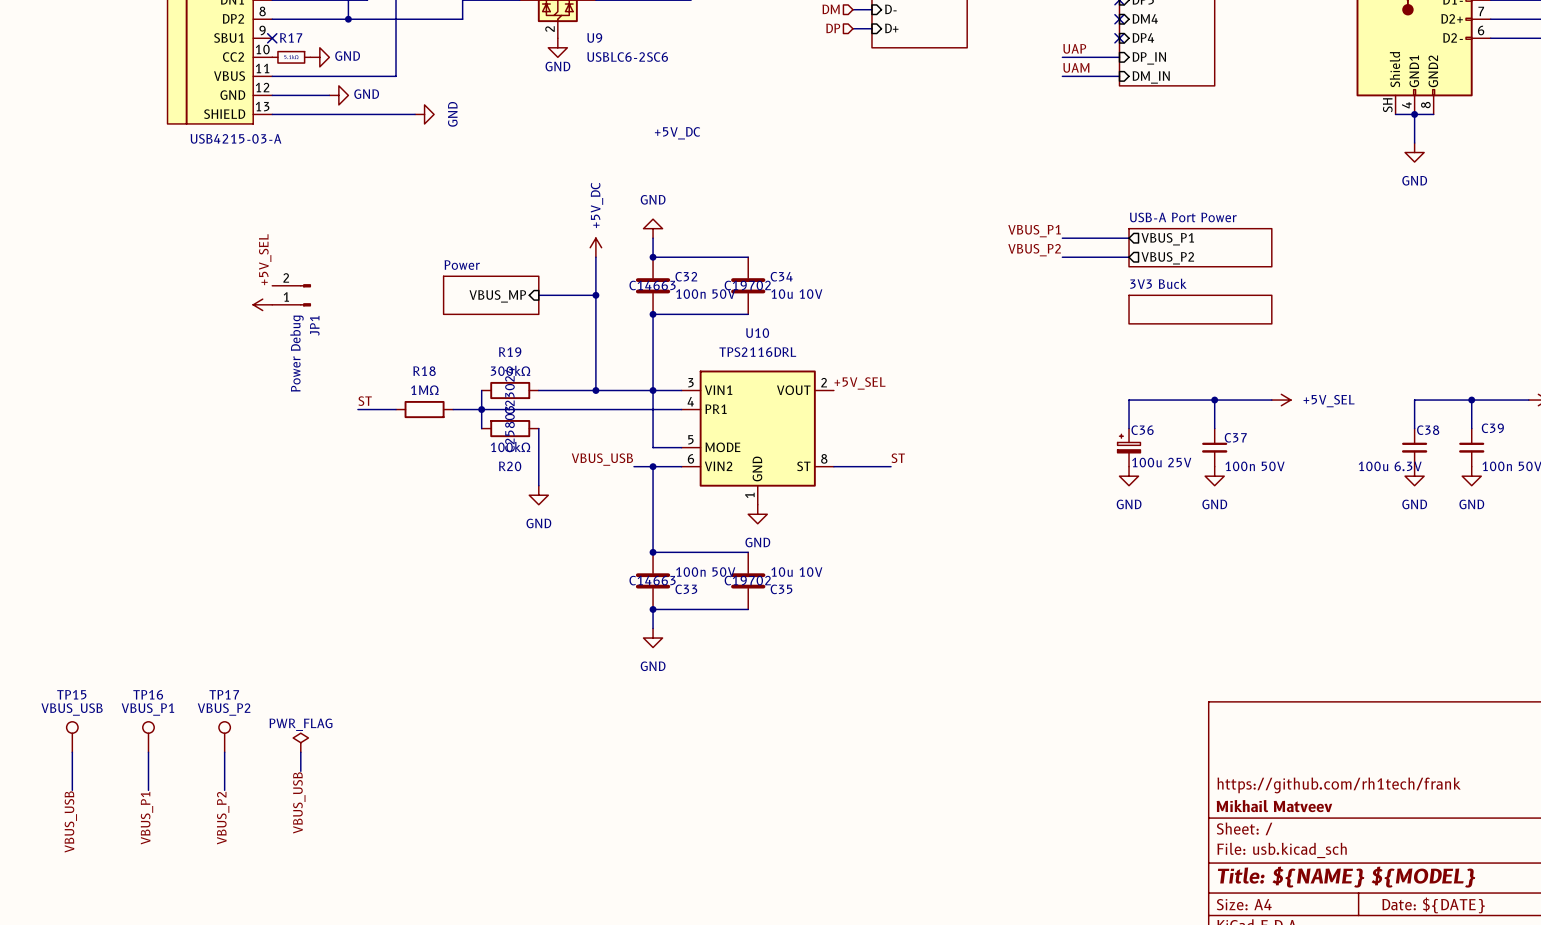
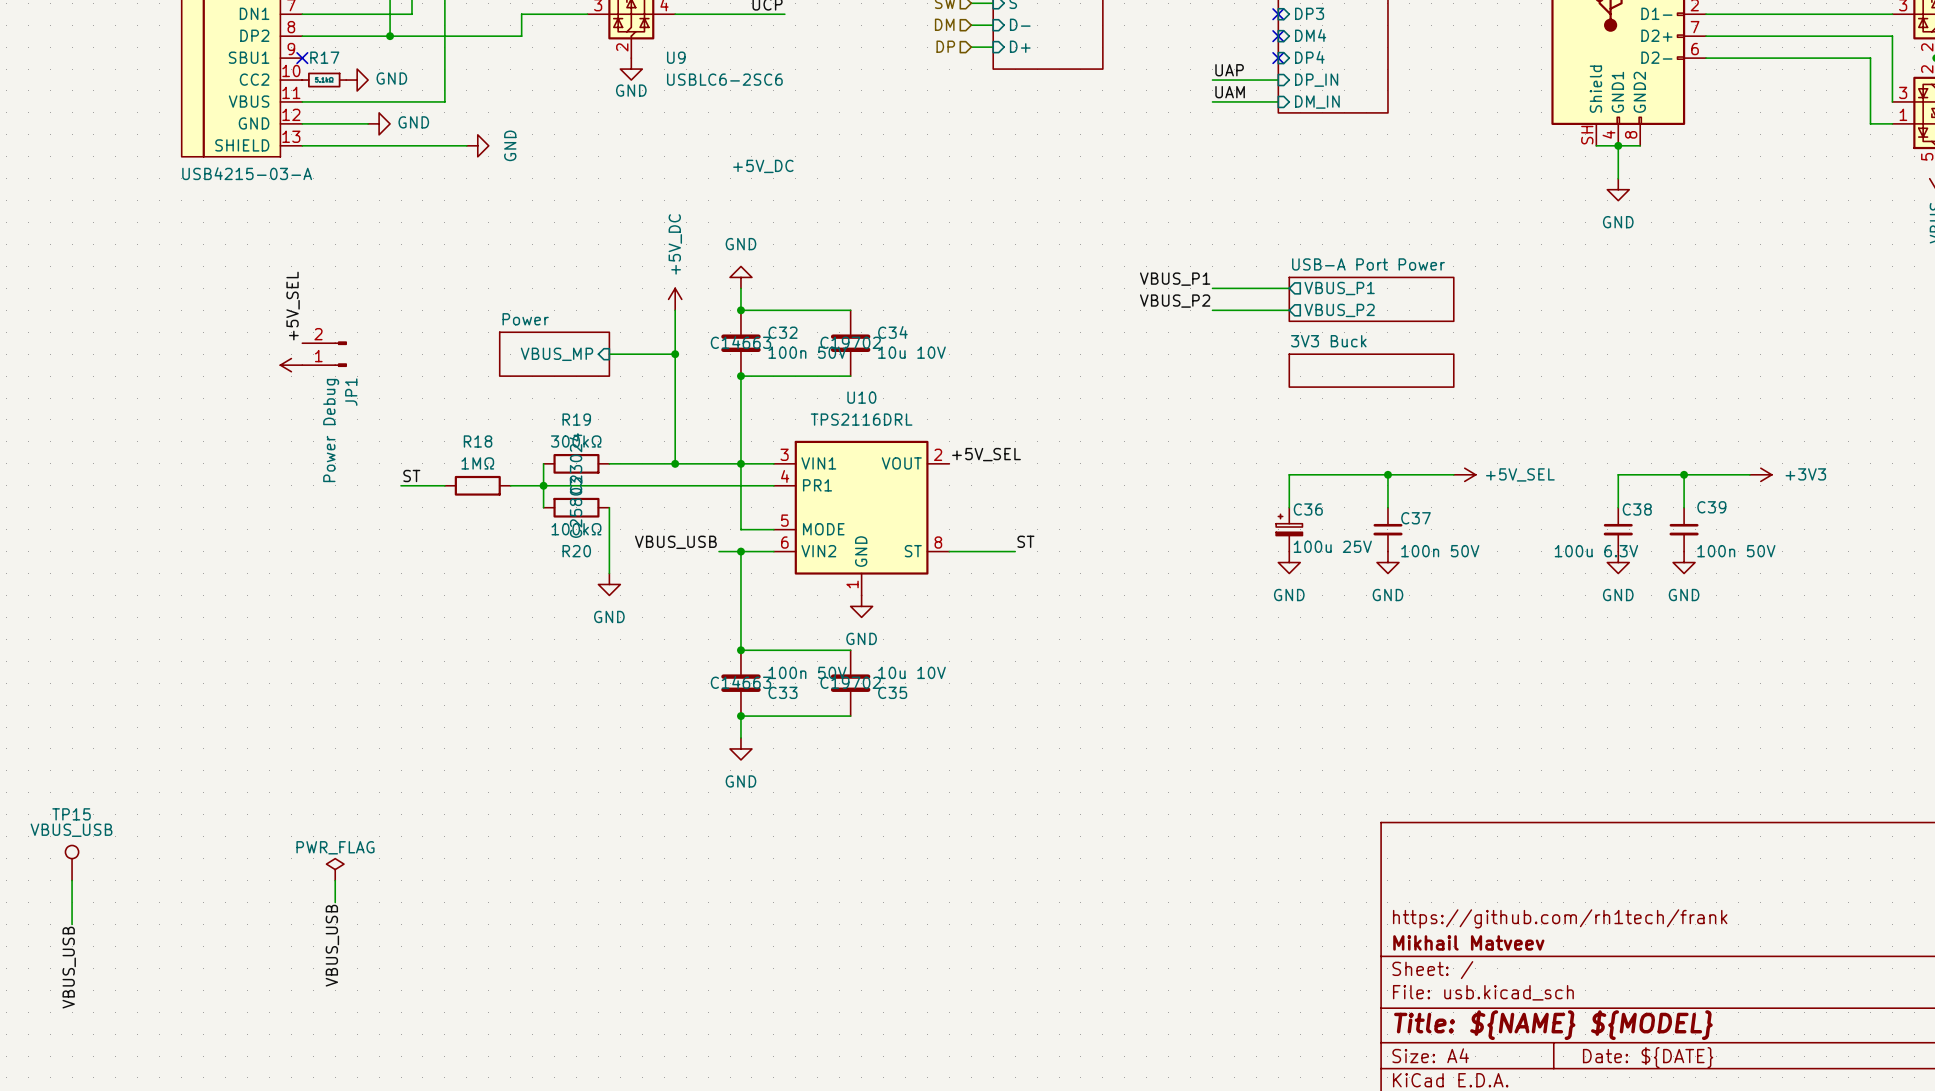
TP16: VBUS_P1 (148, 737) -> none
TP17: VBUS_P2 (224, 737) -> none
wire: (148, 752) (148, 790) -> none
wire: (224, 752) (224, 790) -> none
label: VBUS_P1 (146, 818) -> none
label: VBUS_P2 (223, 818) -> none

